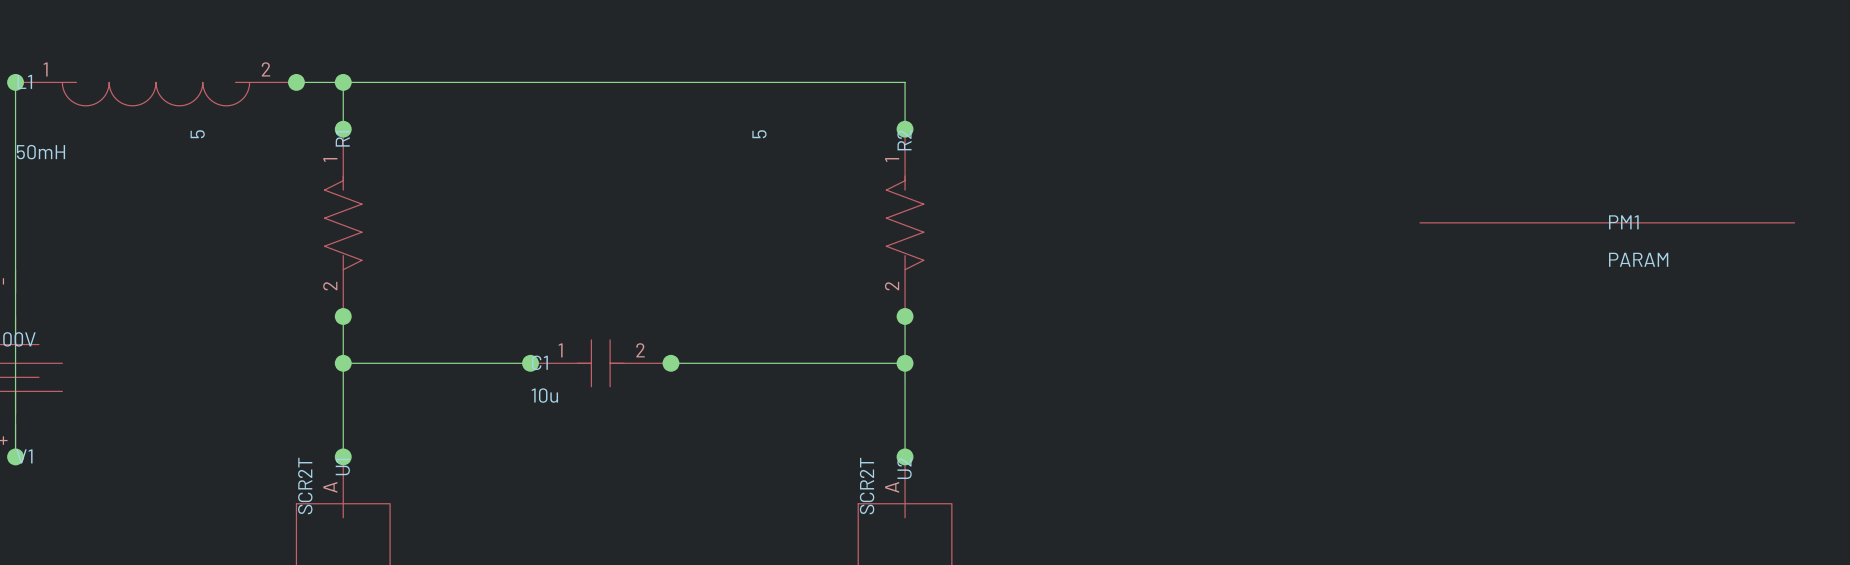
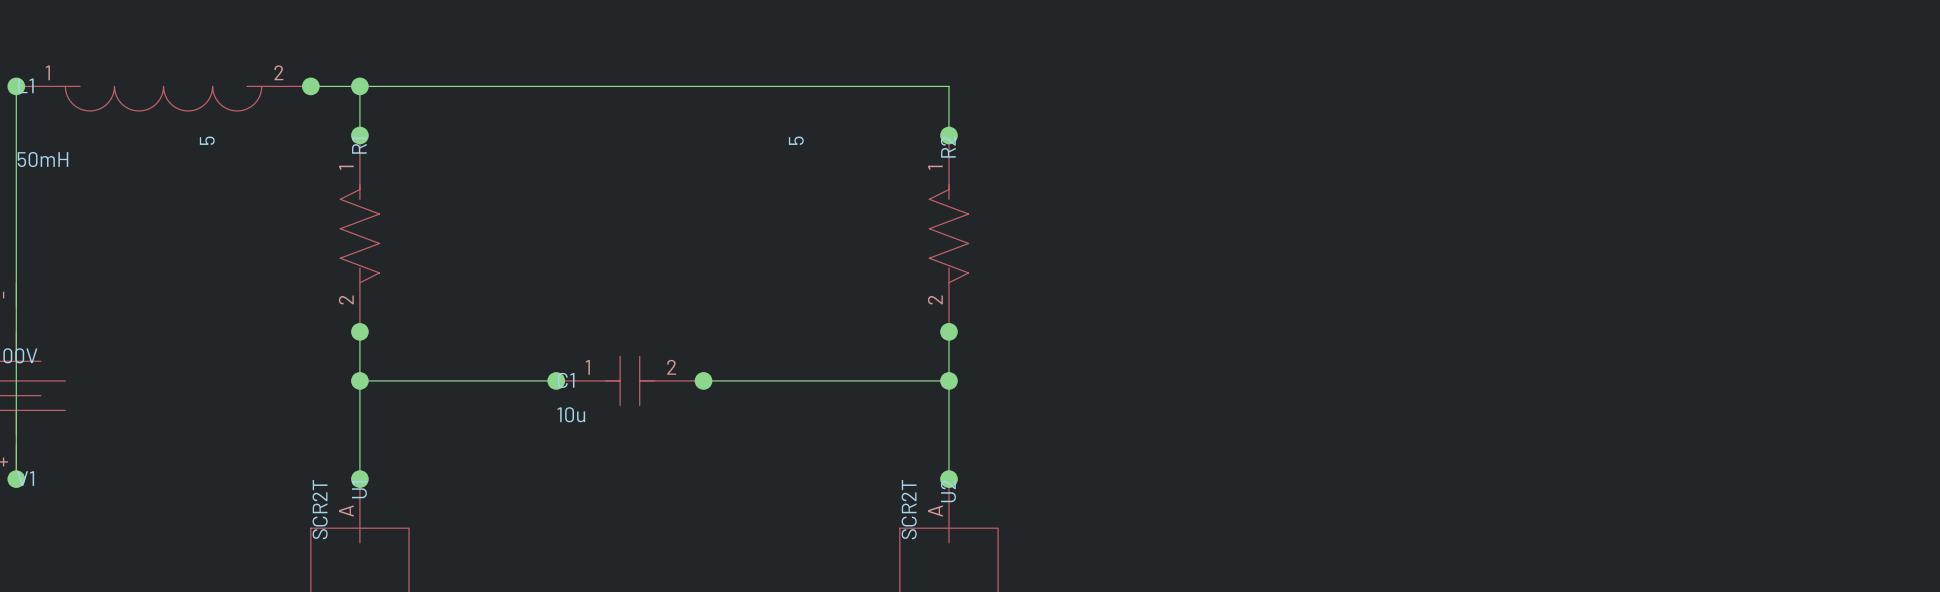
PM1: PARAM (1607, 222) -> none

